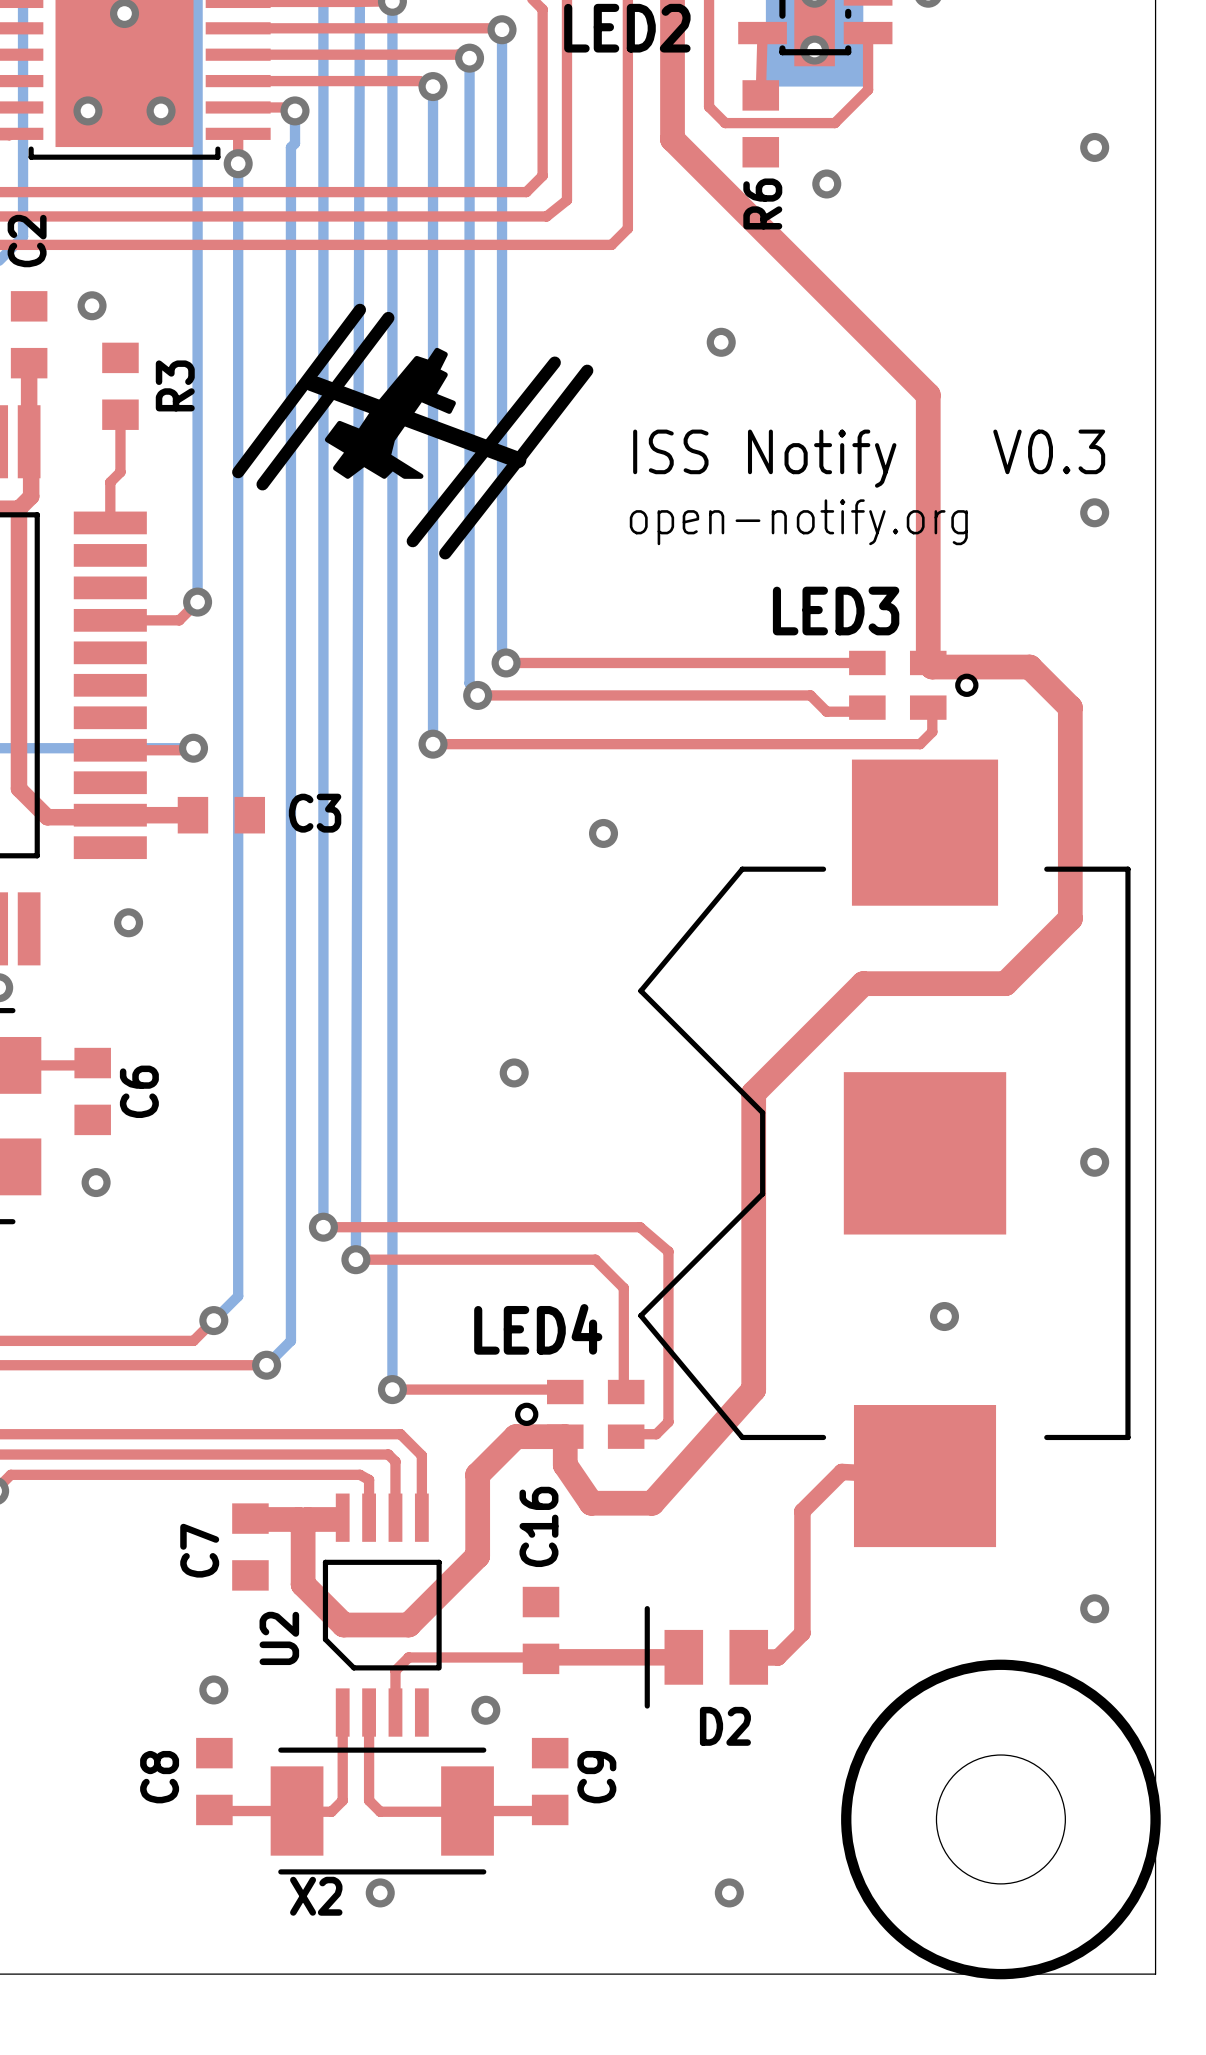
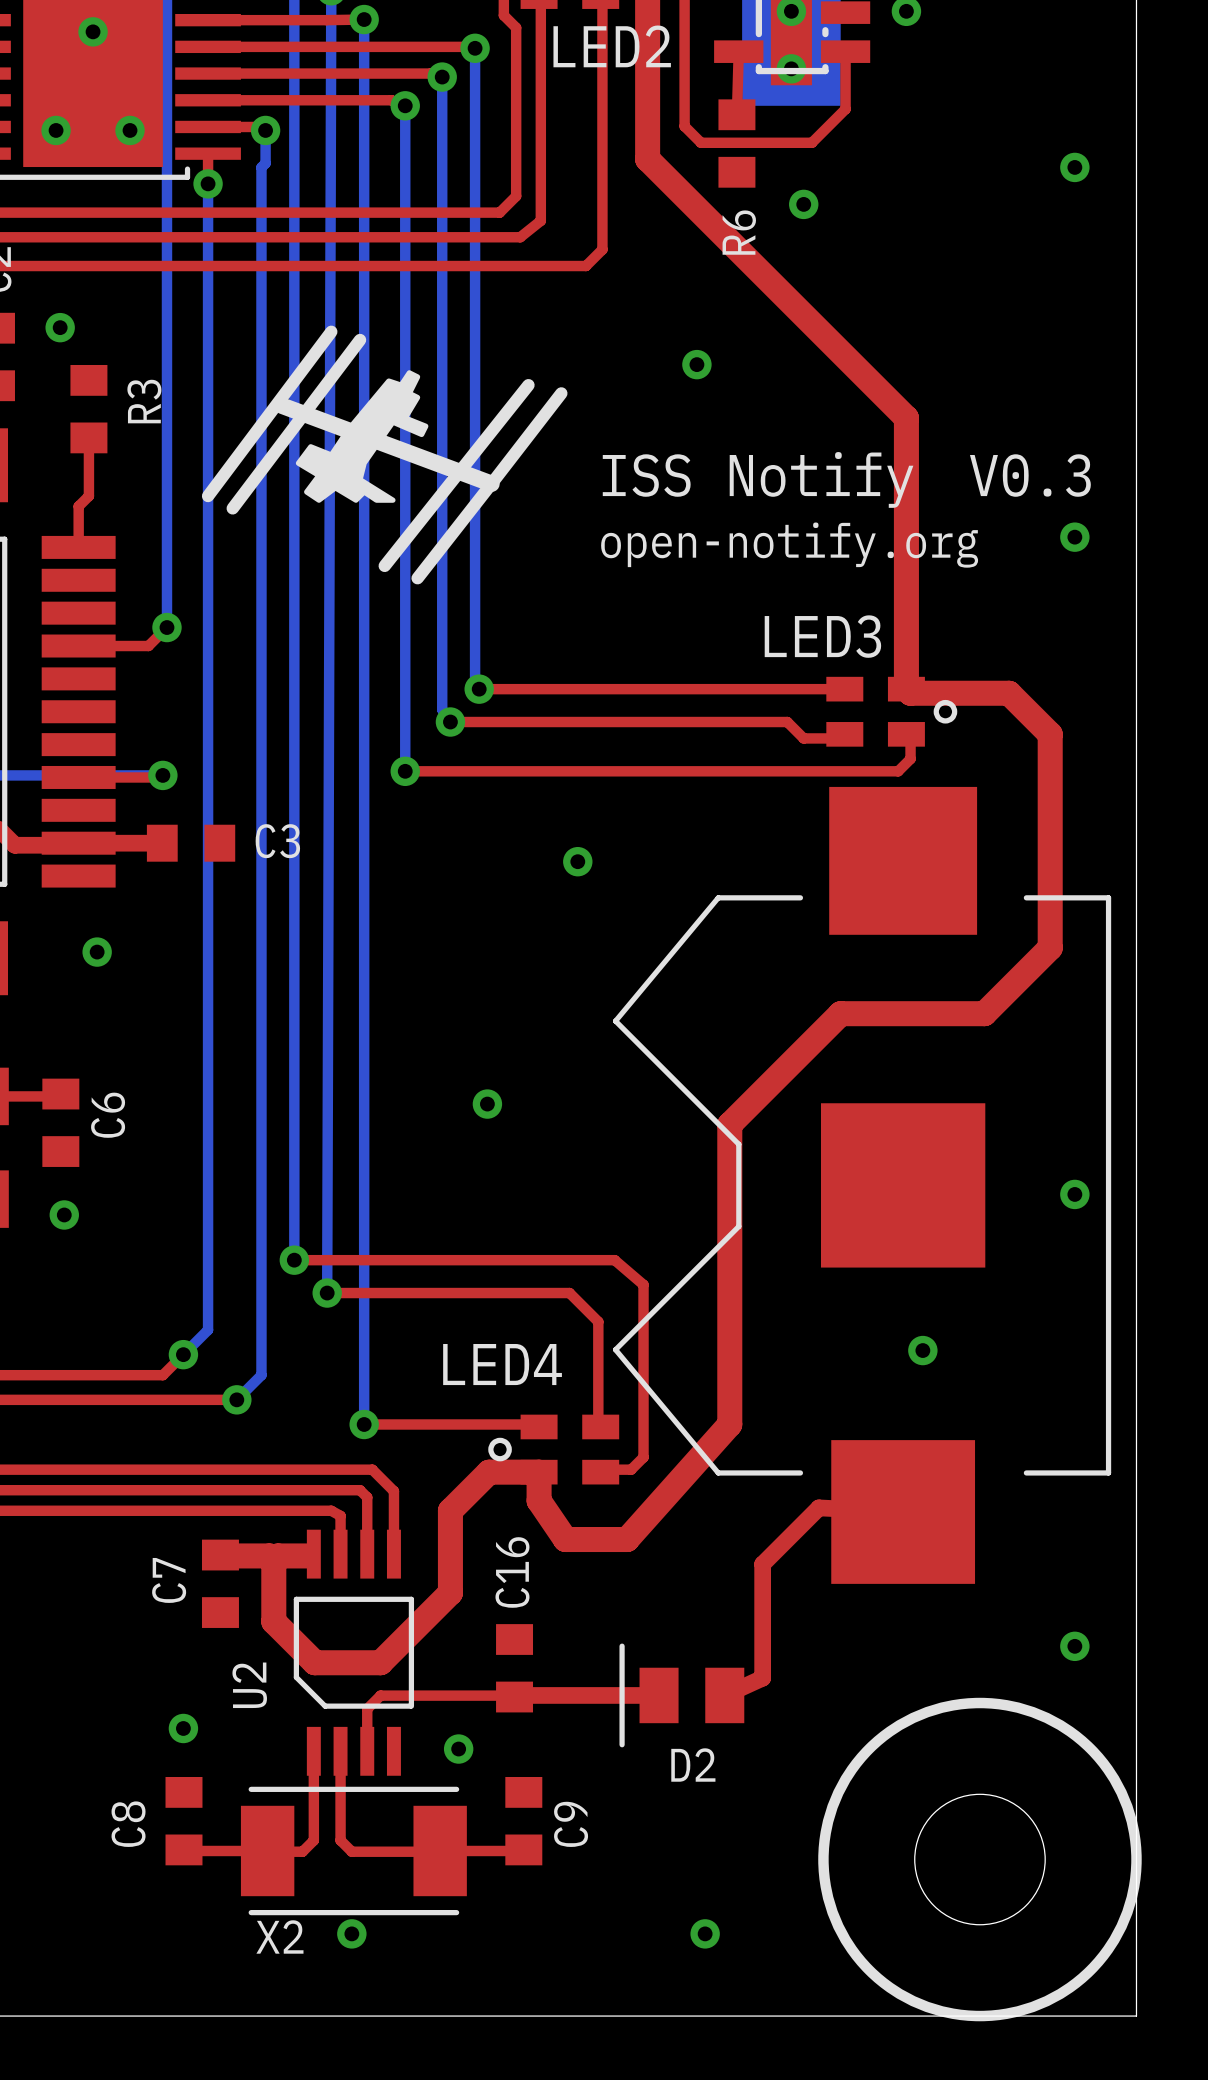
top track: (802, 1511) (802, 1633) (778, 1657) (748, 1657) -> (779, 1547) (762, 1564) (762, 1678) (724, 1695)

